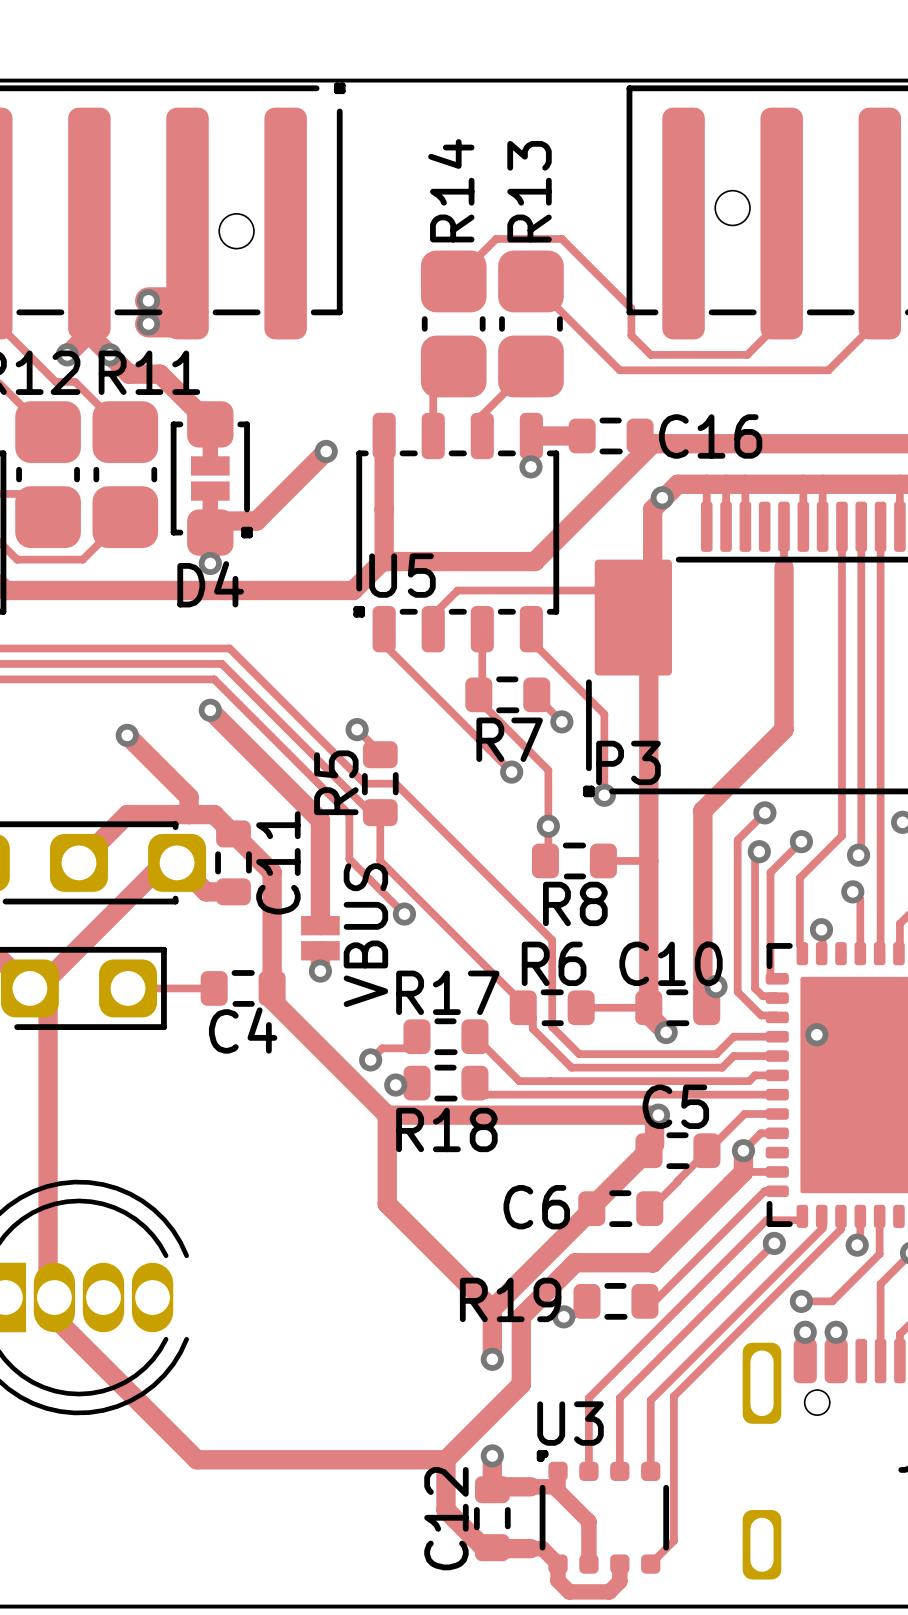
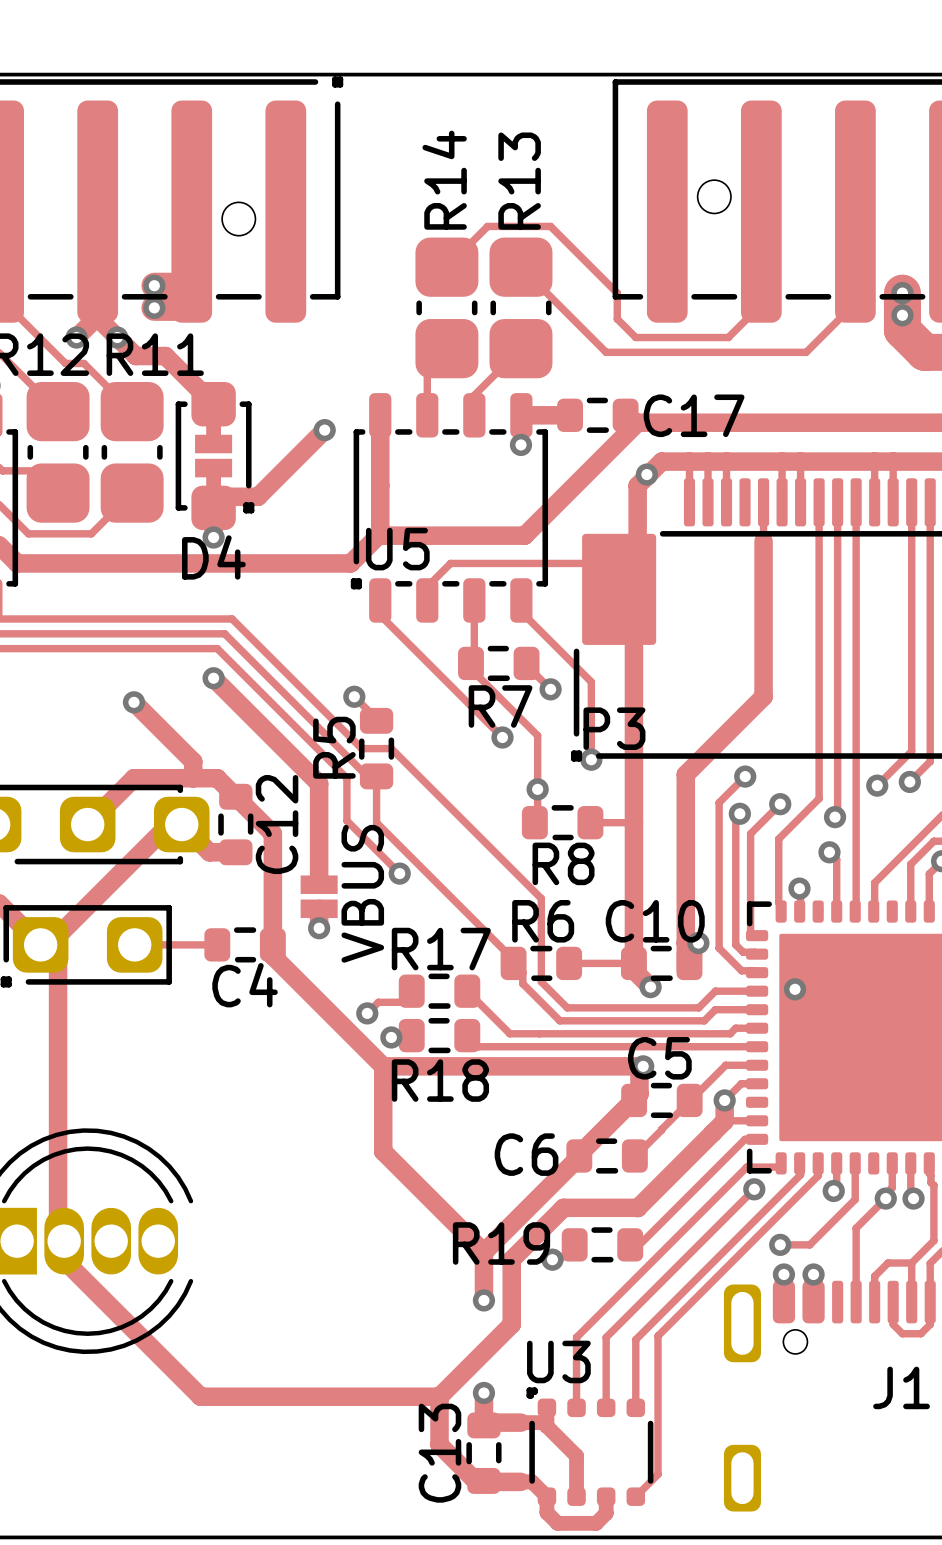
C16 name: C16 (710, 436) -> C17 (694, 415)
C11 name: C11 (278, 862) -> C12 (277, 824)
C12 name: C12 (446, 1518) -> C13 (439, 1453)

